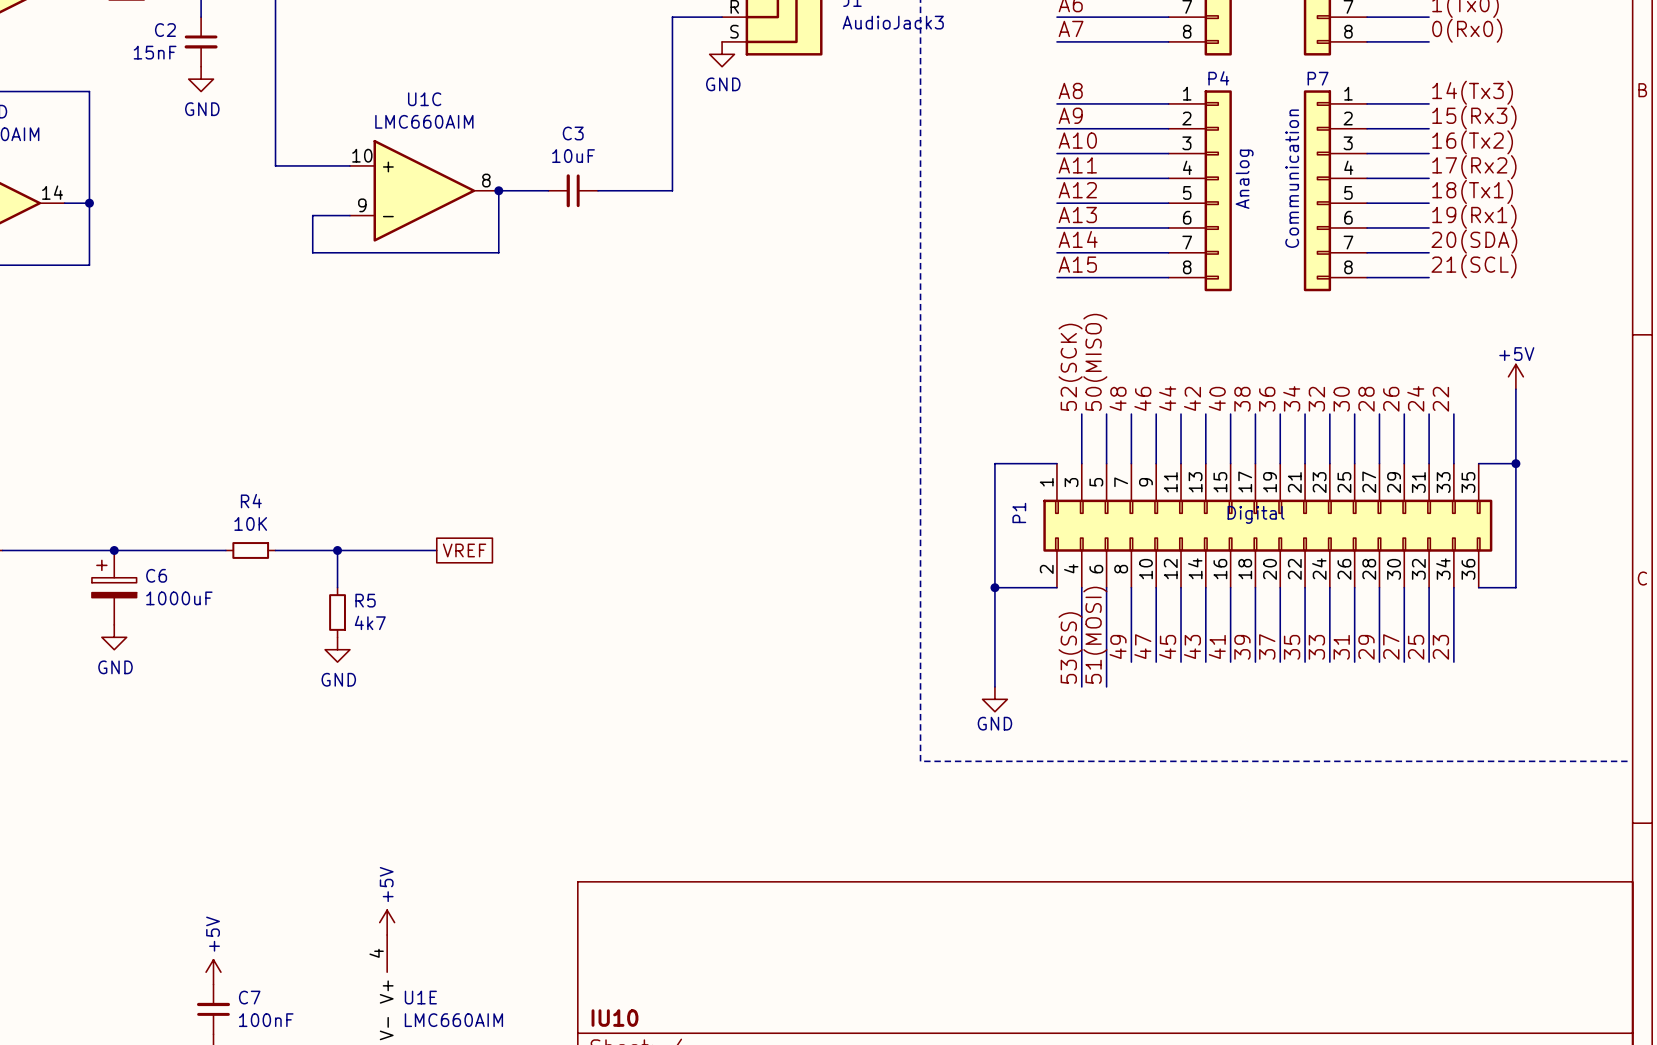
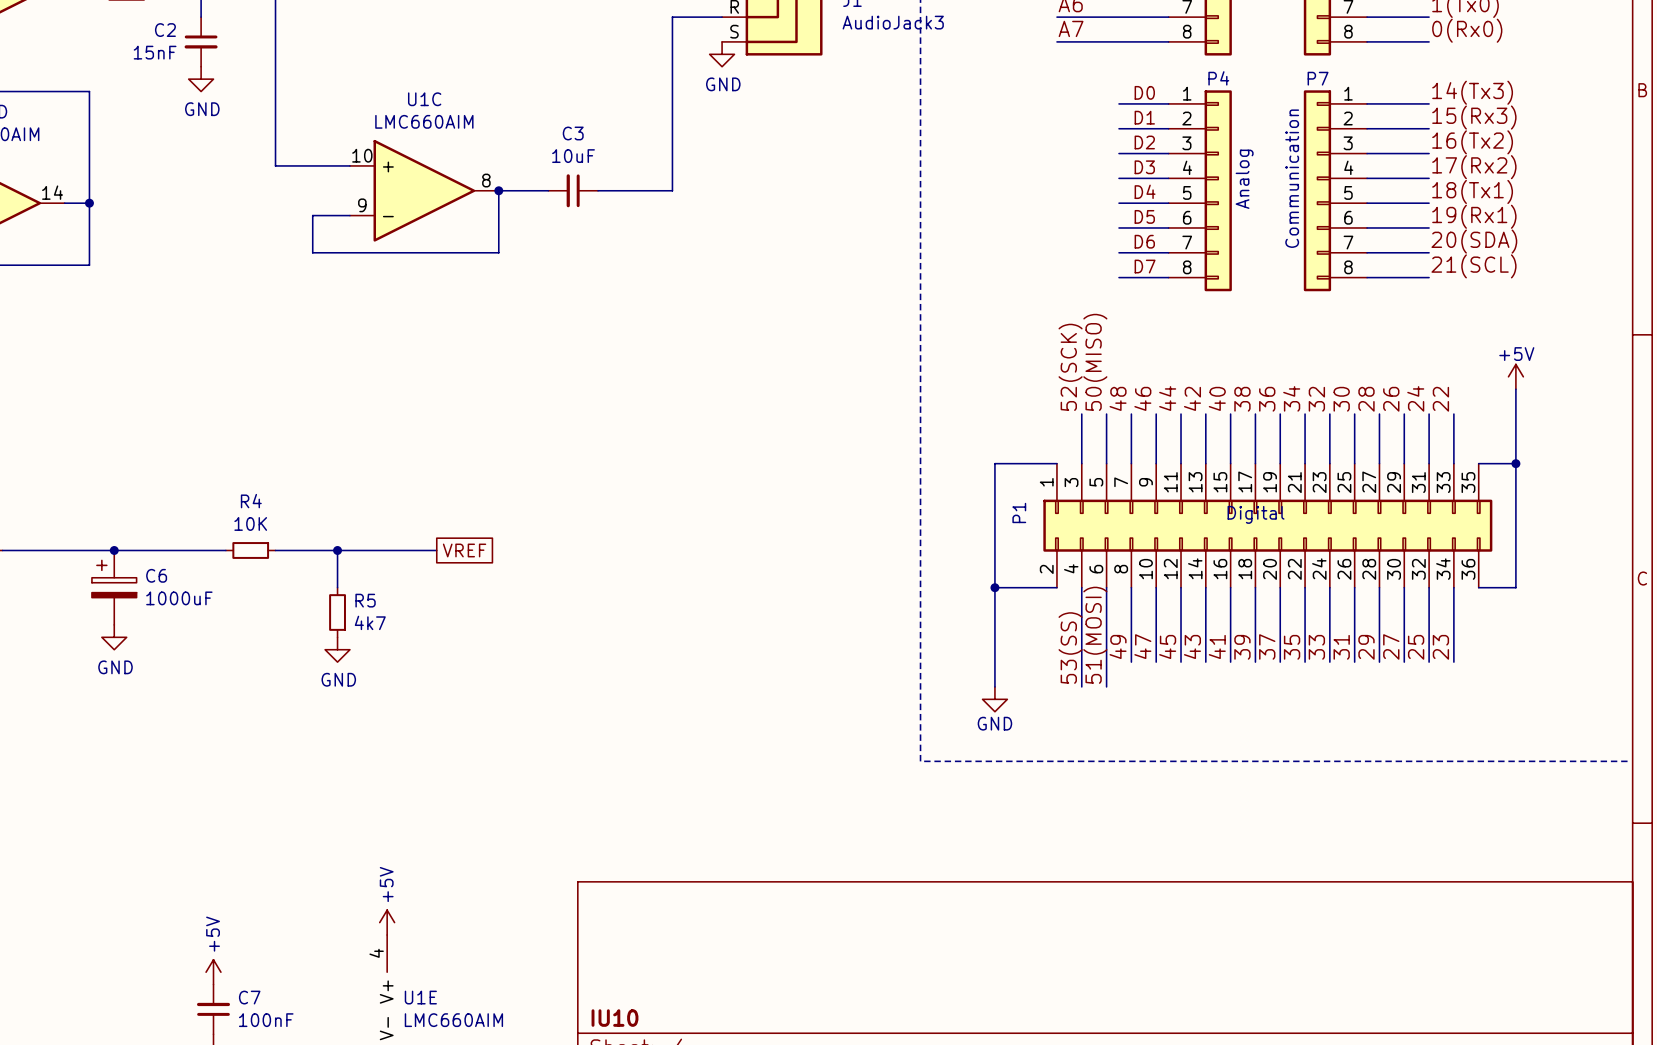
label: A8 (1070, 90) -> none
label: none -> D0 (1144, 92)
wire: (1056, 103) (1118, 103) -> none
label: A9 (1070, 115) -> none
label: none -> D1 (1144, 117)
wire: (1056, 128) (1118, 128) -> none
label: A10 (1077, 140) -> none
label: none -> D2 (1144, 142)
wire: (1056, 153) (1118, 153) -> none
label: A11 (1077, 165) -> none
label: none -> D3 (1144, 167)
wire: (1056, 178) (1118, 178) -> none
label: A12 (1077, 190) -> none
label: none -> D4 (1145, 191)
wire: (1056, 203) (1118, 203) -> none
label: A13 (1077, 215) -> none
label: none -> D5 (1144, 216)
wire: (1056, 227) (1118, 227) -> none
label: A14 (1078, 239) -> none
label: none -> D6 (1144, 241)
wire: (1056, 252) (1118, 252) -> none
label: A15 (1077, 264) -> none
label: none -> D7 (1145, 266)
wire: (1056, 277) (1118, 277) -> none

